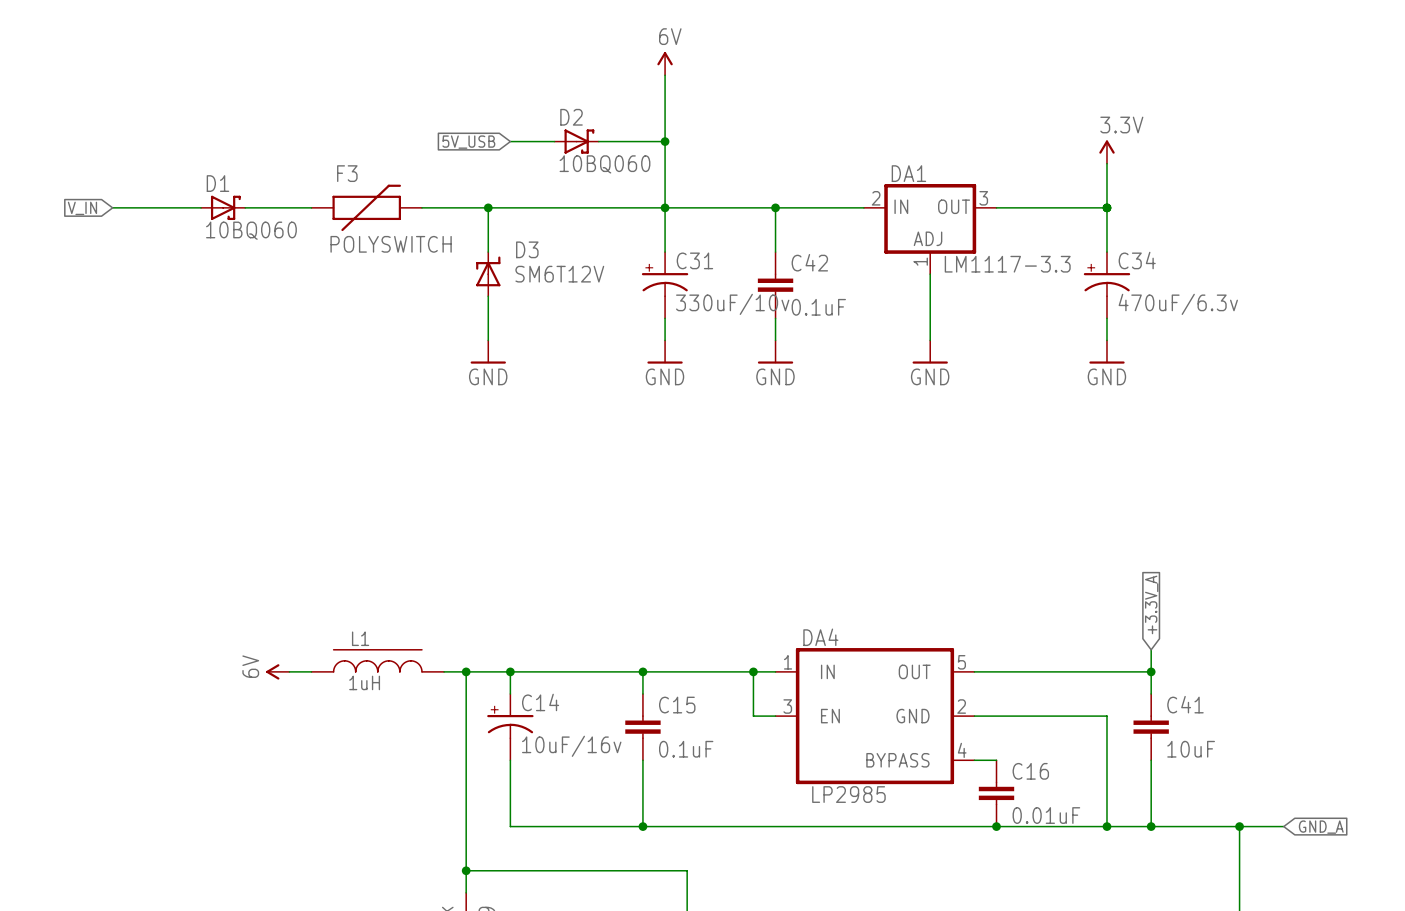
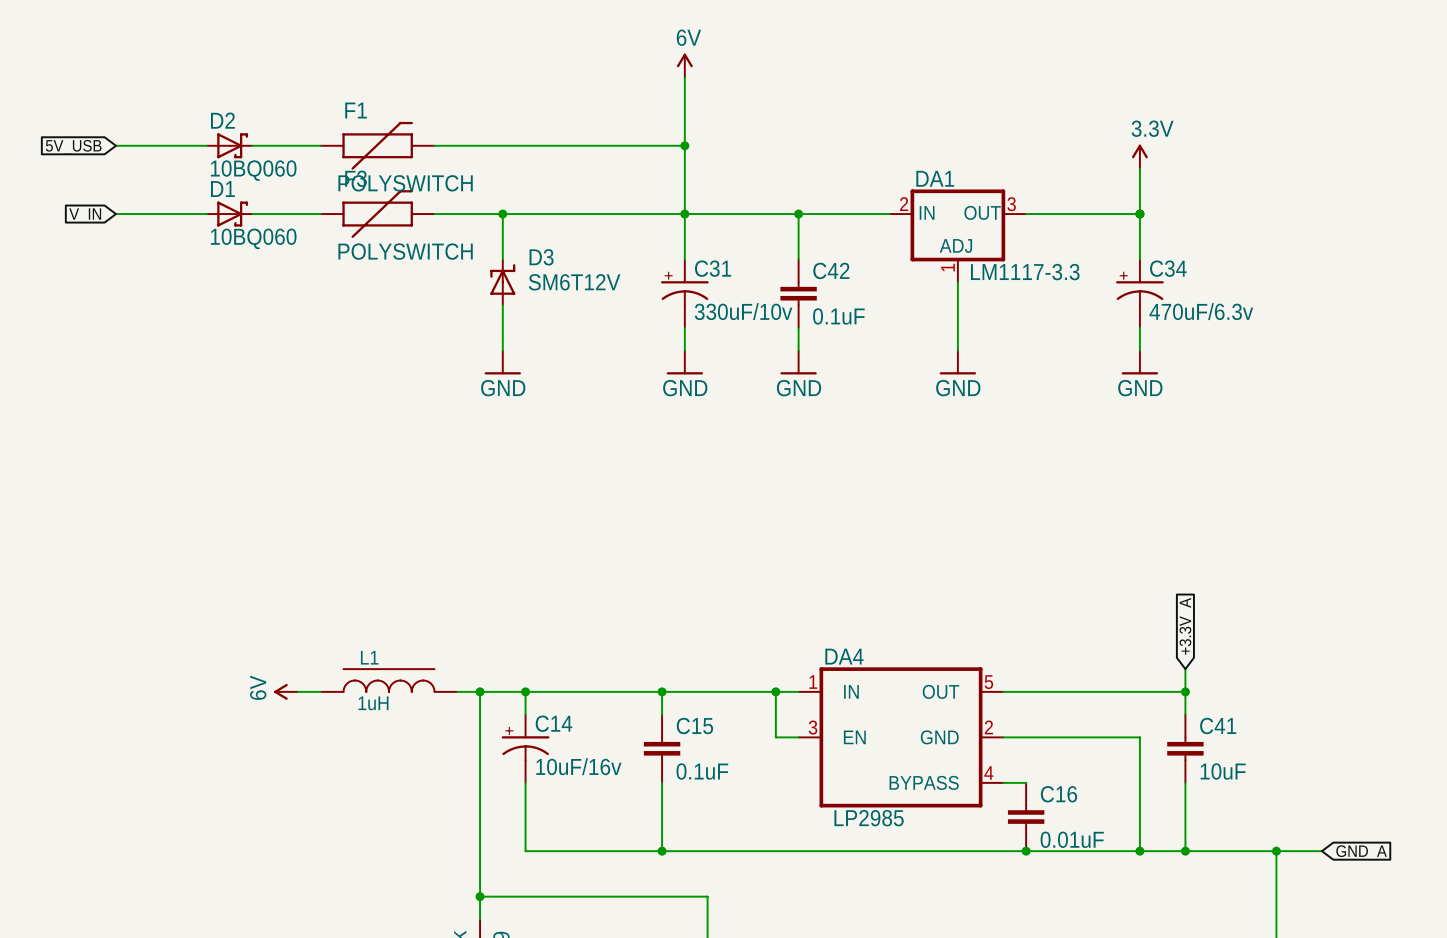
wire: none -> (115, 145) (207, 145)
wire: none -> (252, 145) (320, 145)
F1: none -> POLYSWITCH (377, 145)
wire: none -> (434, 145) (525, 145)
D2 position: (576, 141) -> (229, 145)
global label: none -> 5V_USB (73, 147)
global label: 5V_USB (468, 142) -> none

